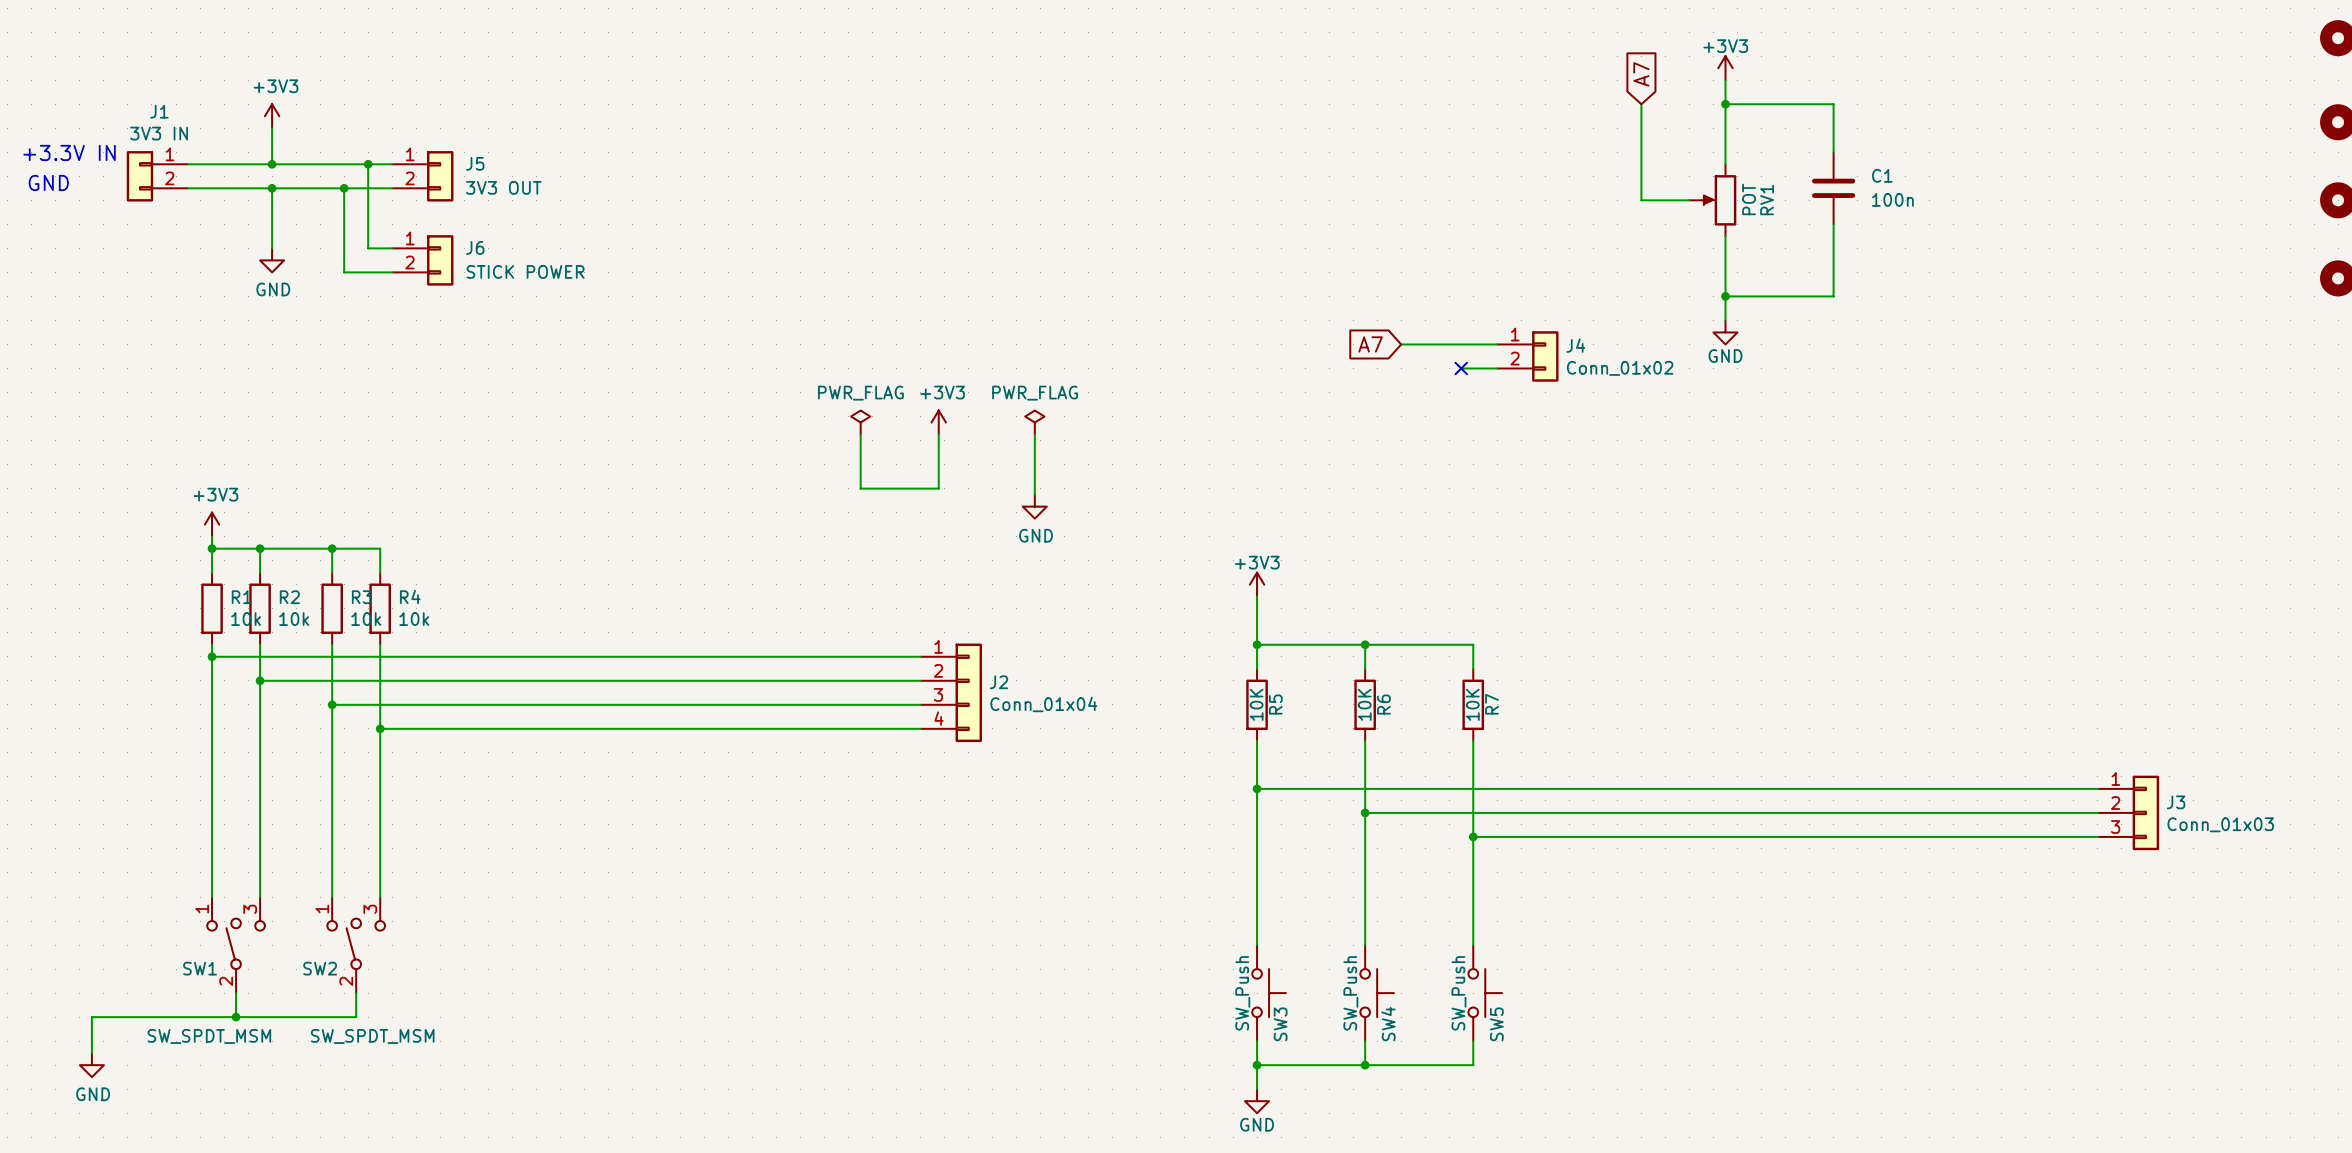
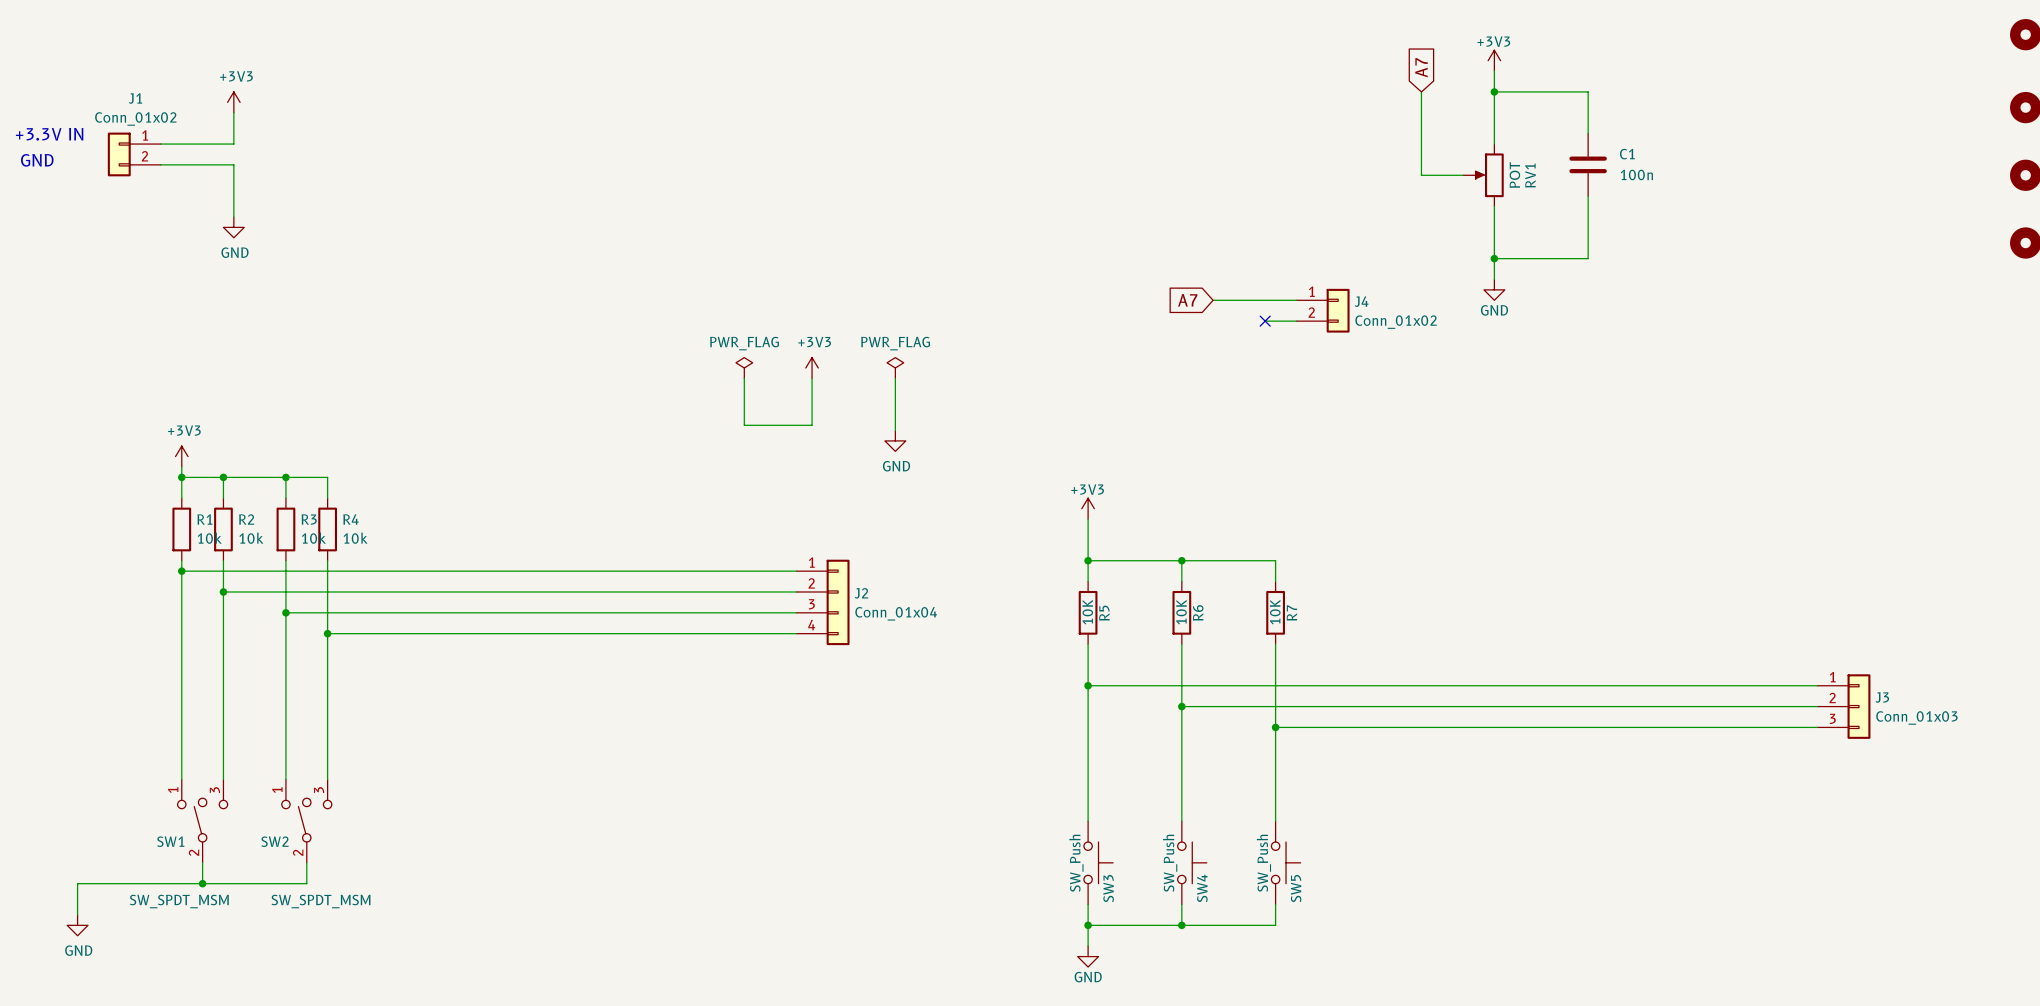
J1 value: 3V3 IN (159, 133) -> Conn_01x02 (135, 118)
wire: (272, 164) (392, 164) -> none
junction: (272, 164) -> none
wire: (368, 164) (368, 248) (392, 248) -> none
junction: (368, 164) -> none
J5: 3V3 OUT (422, 176) -> none
wire: (272, 188) (392, 188) -> none
junction: (272, 188) -> none
wire: (344, 188) (344, 272) (392, 272) -> none
junction: (344, 188) -> none
J6: STICK POWER (422, 260) -> none

